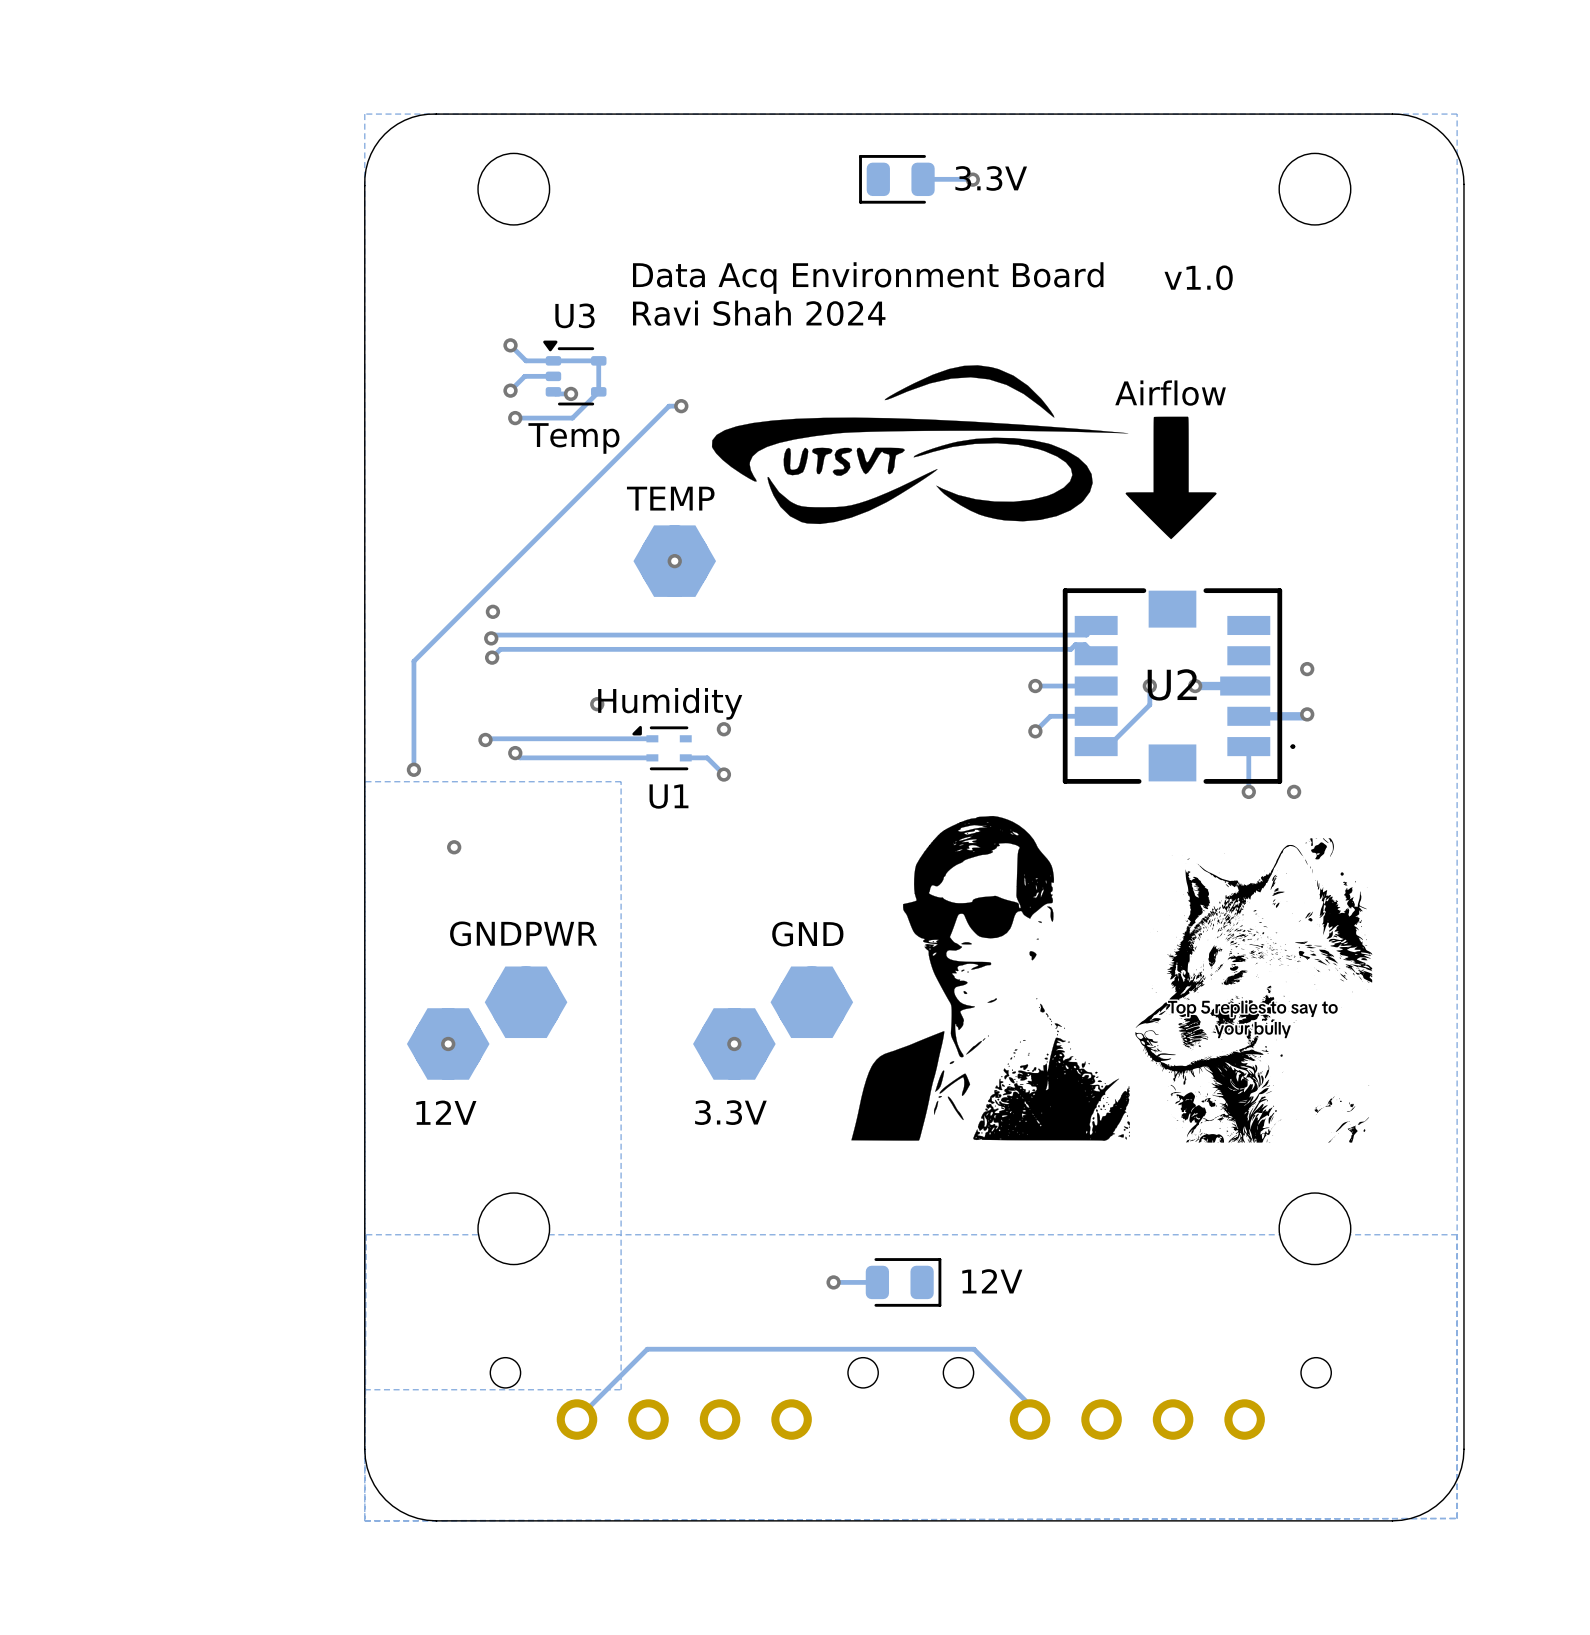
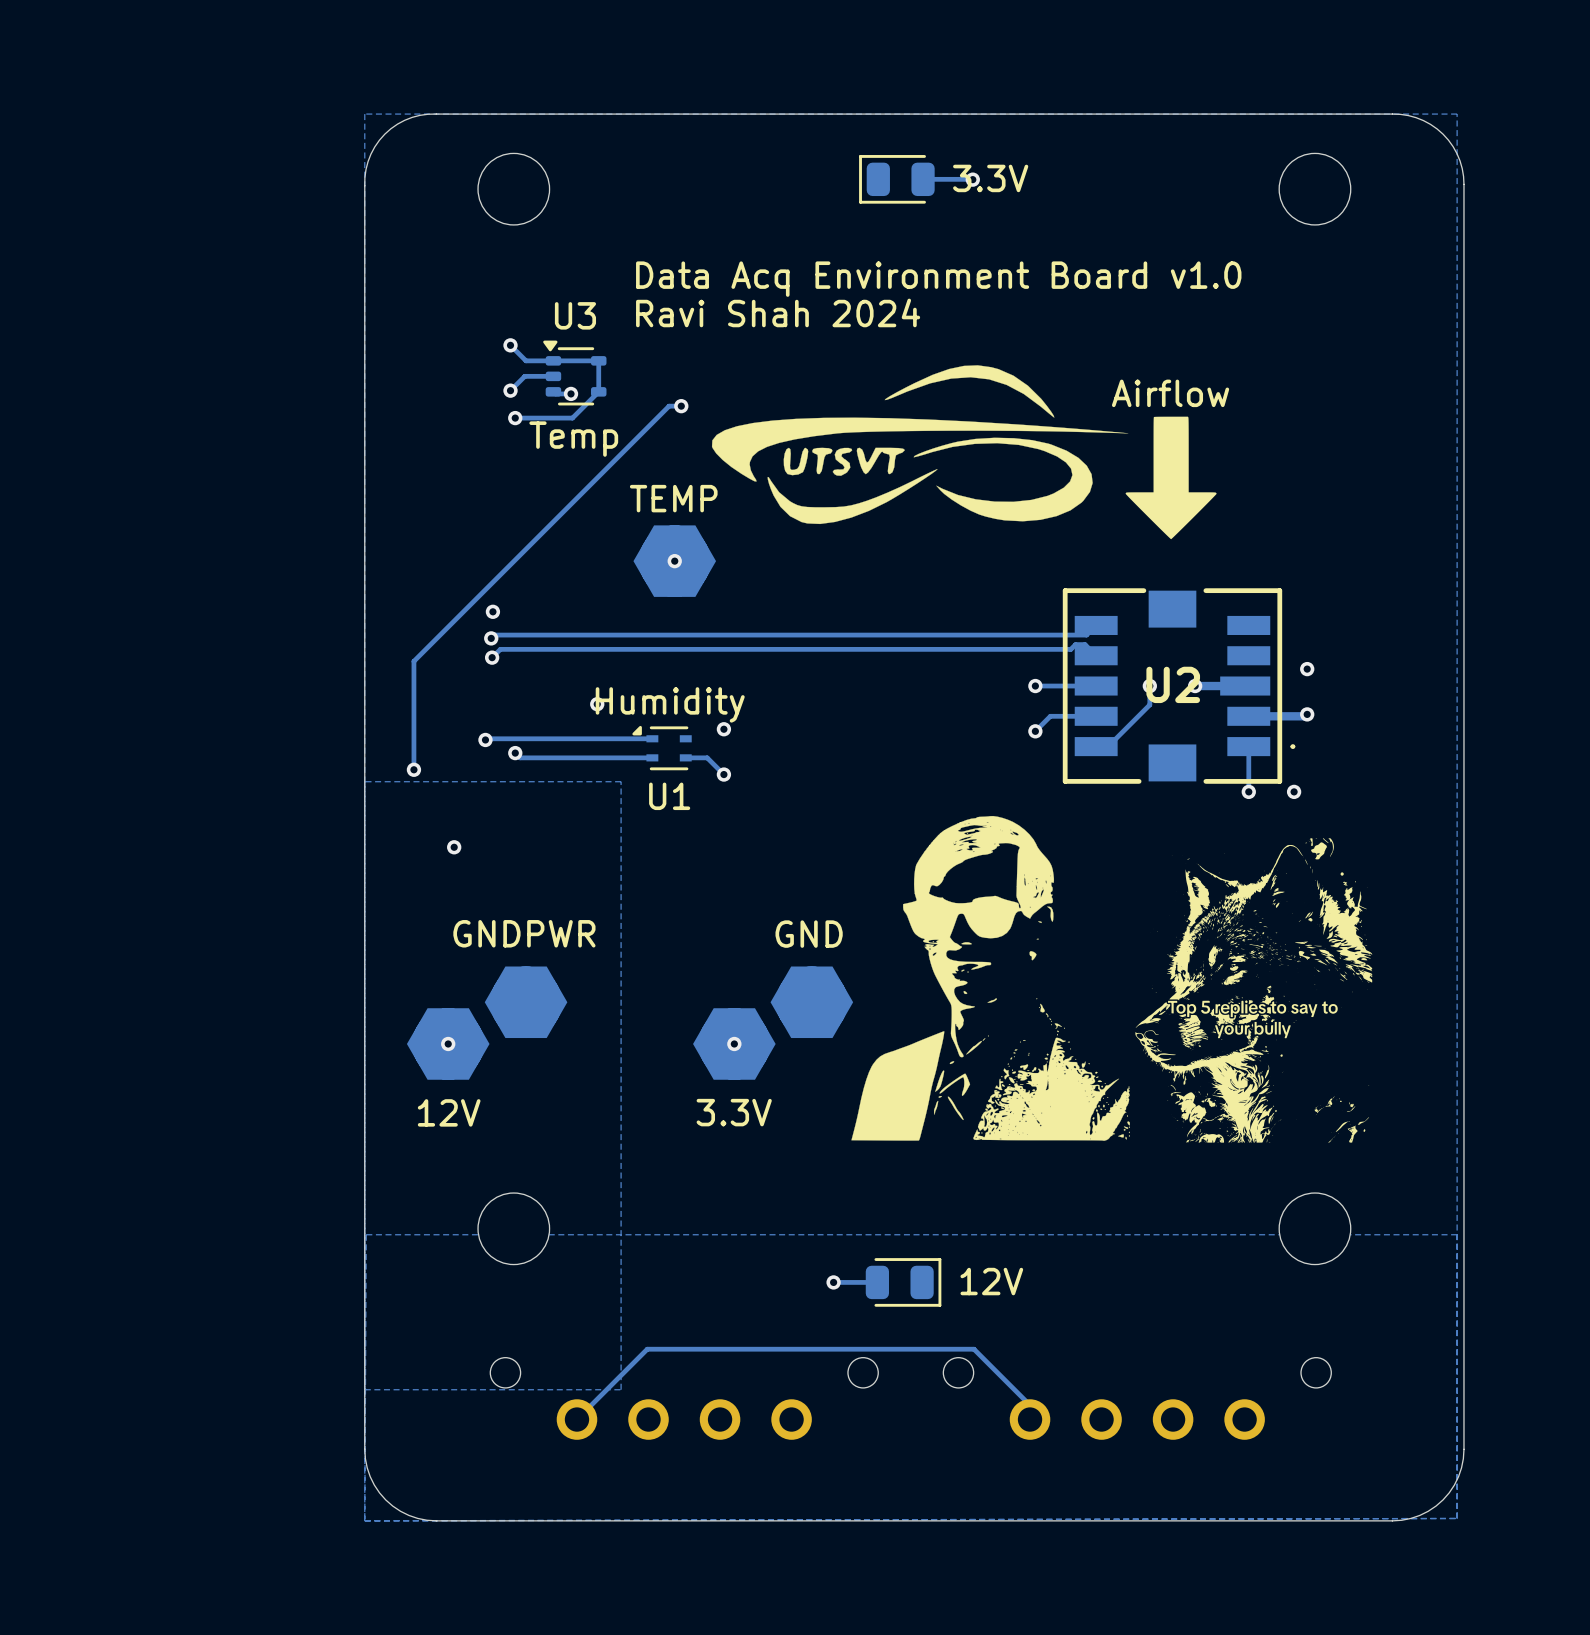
text: v1.0 (1198, 277) -> none
text: Data Acq Environment Board (868, 278) -> Data Acq Environment Board v1.0 (938, 279)

